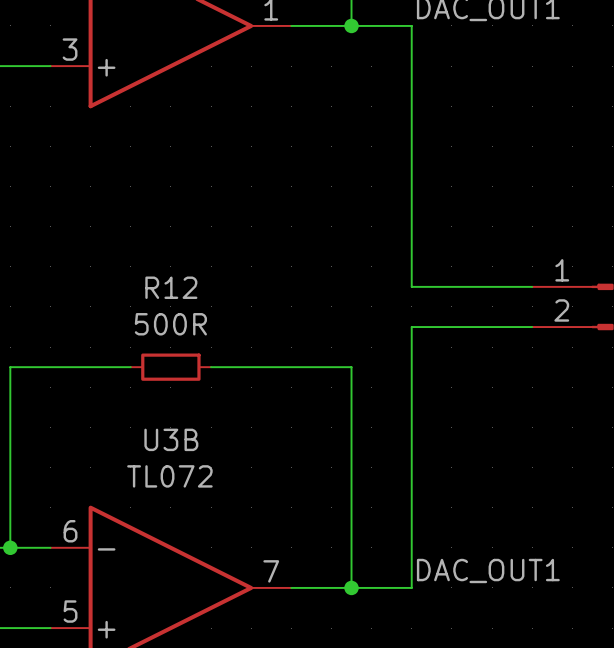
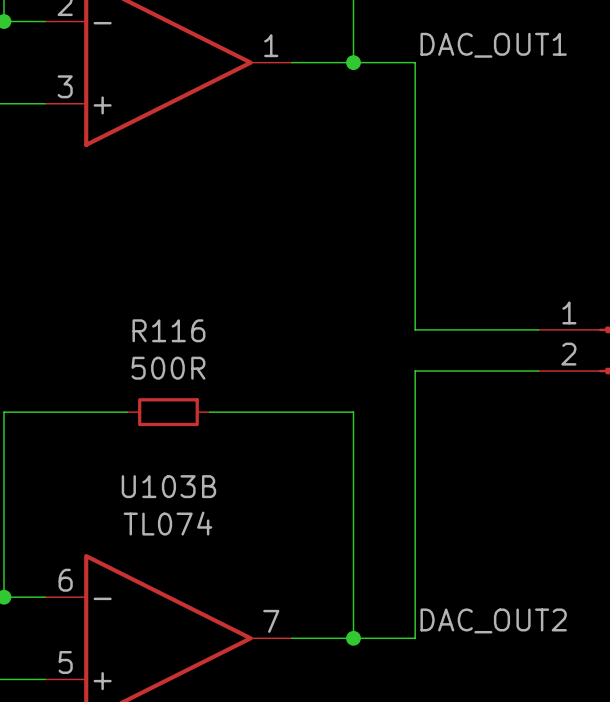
R12 name: R12 (171, 287) -> R116 (168, 330)
U3B name: U3B (171, 439) -> U103B (168, 486)
U3B value: TL072 (169, 476) -> TL074 (167, 523)
label: DAC_OUT1 (488, 570) -> DAC_OUT2 (493, 620)

